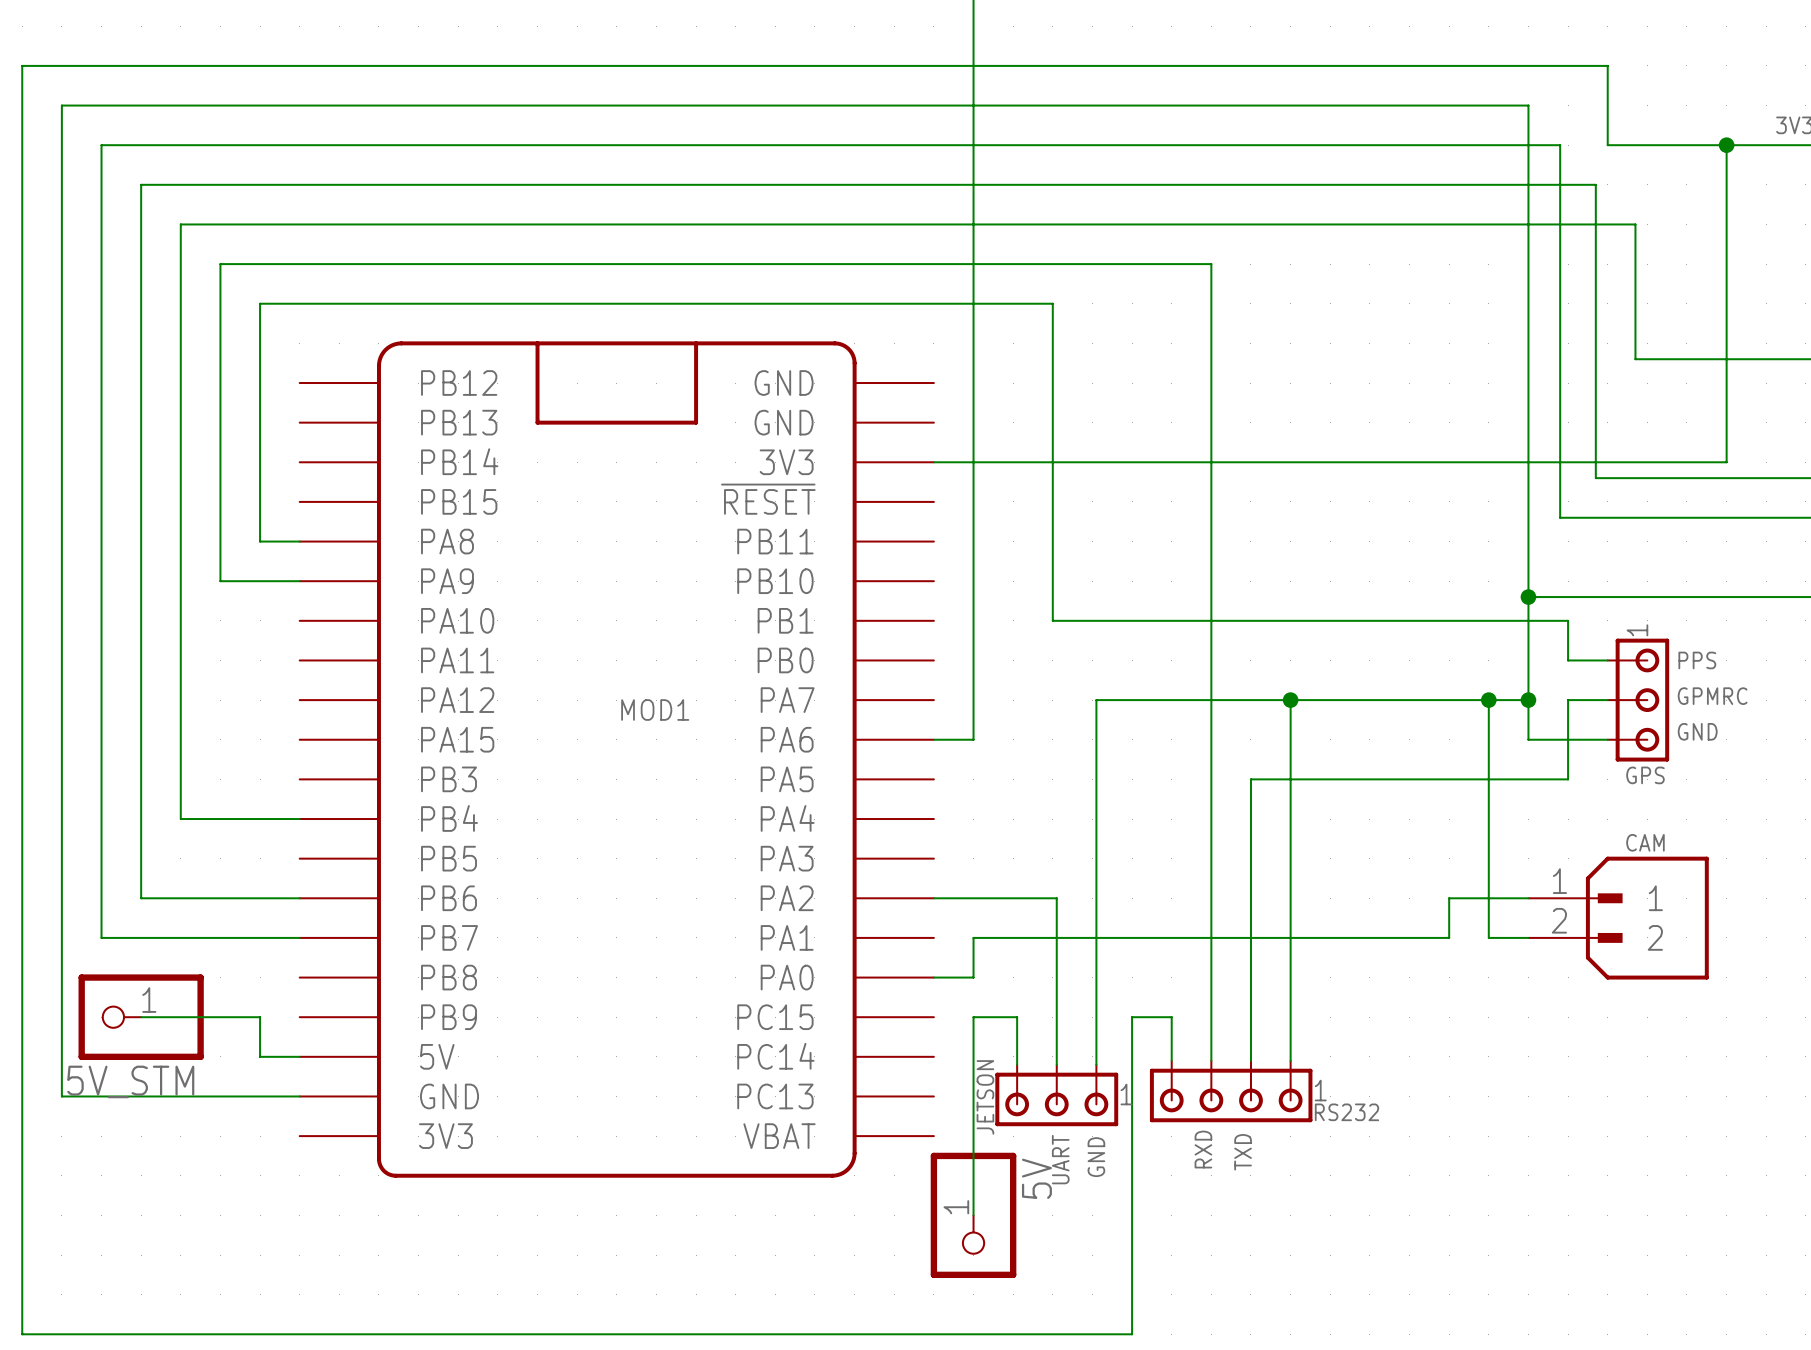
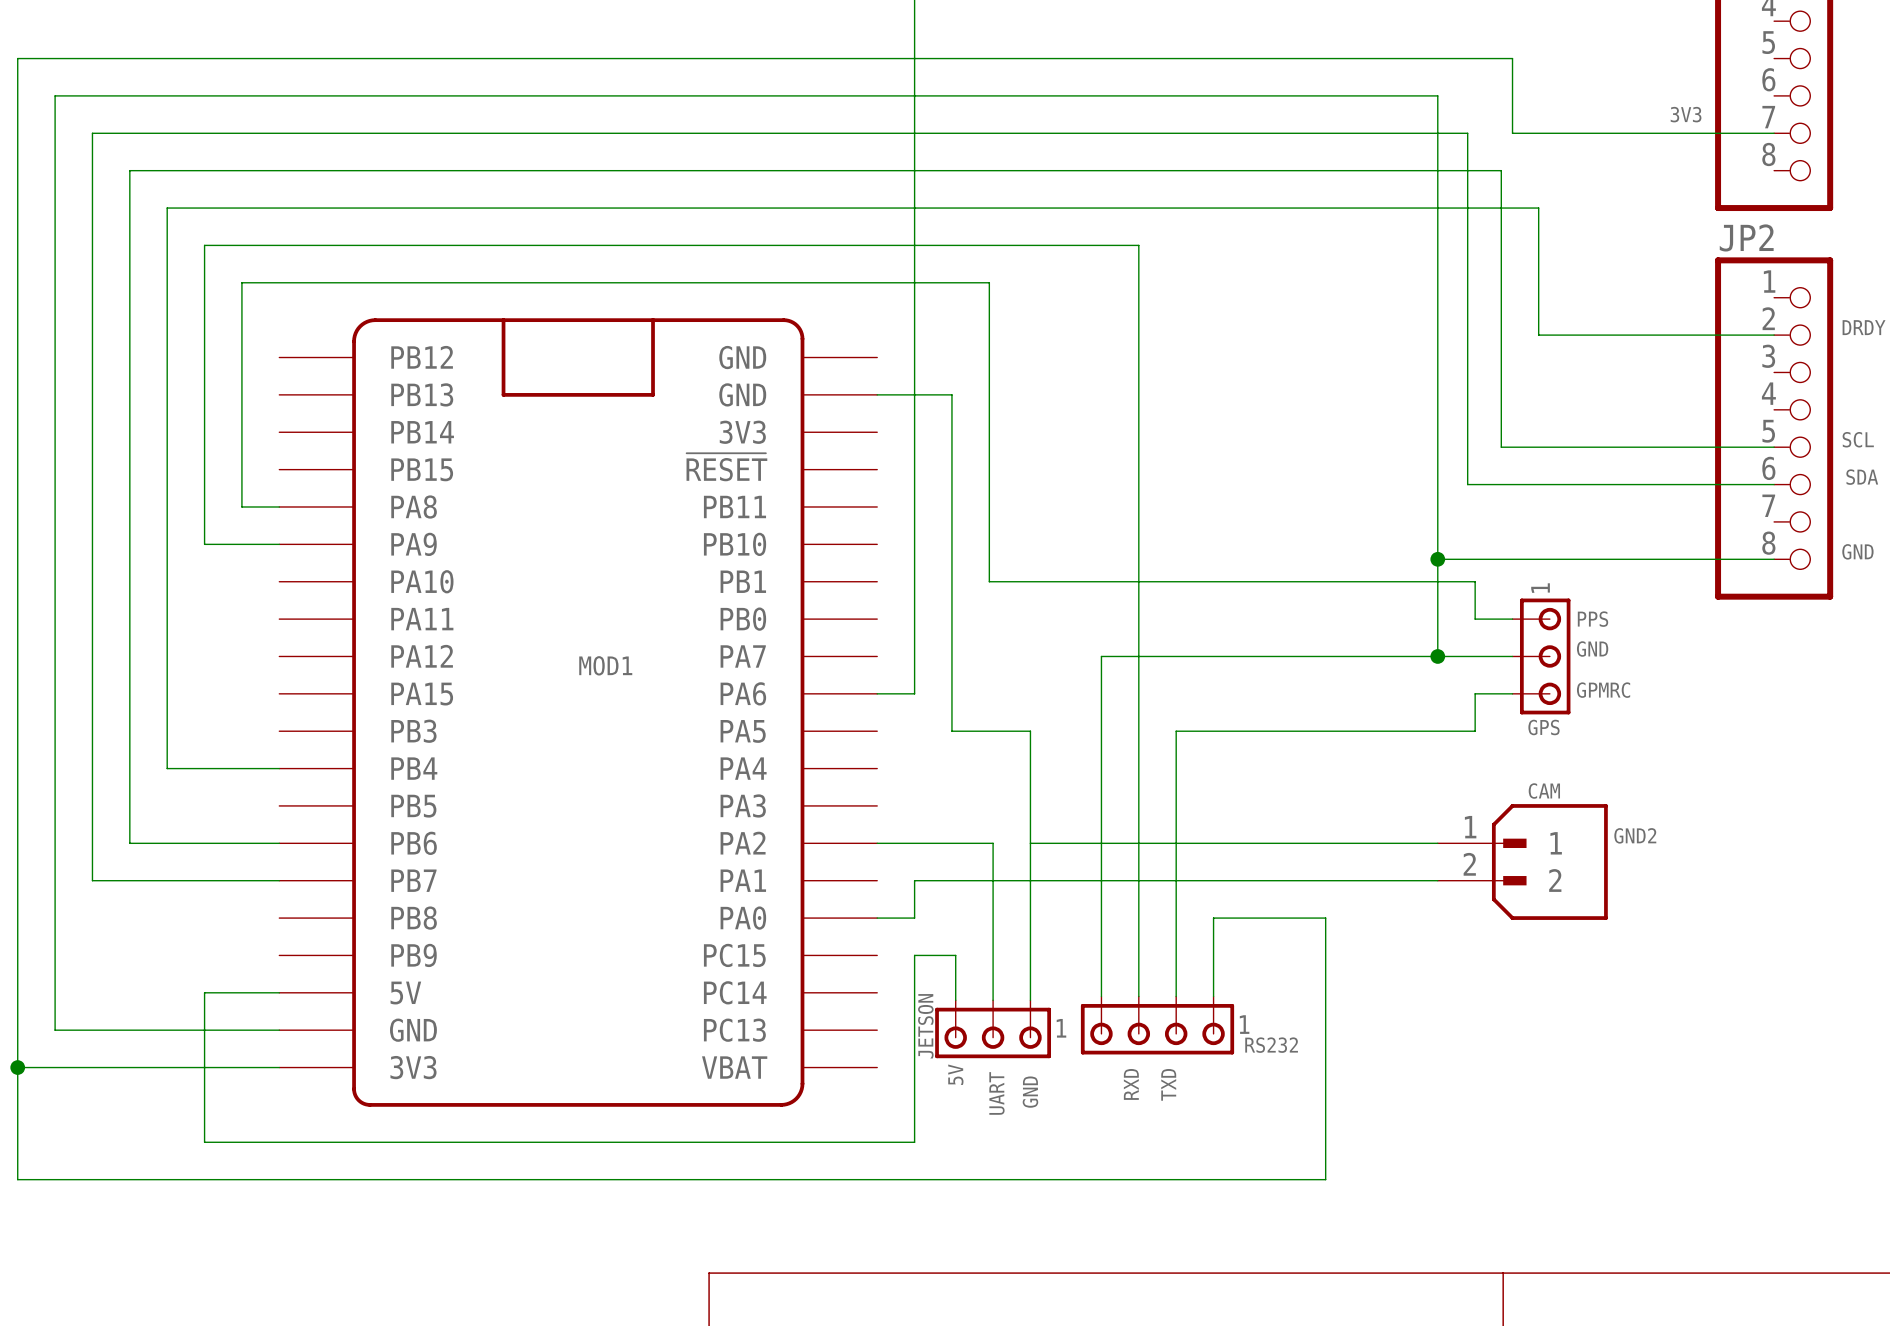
wire: (1726, 145) (1726, 462) (933, 462) -> none
junction: (1726, 145) -> none
wire: none -> (877, 394) (951, 394) (951, 731) (1030, 731)
text position: GPMRC (1712, 696) -> GPMRC (1603, 690)
wire: (1171, 700) (1096, 700) (1096, 779) -> (1101, 656) (1101, 955)
wire: (1290, 700) (1290, 977) -> none
junction: (1290, 700) -> none
wire: (1488, 700) (1488, 937) -> none
junction: (1488, 700) -> none
wire: (1528, 700) (1528, 739) (1568, 739) (1568, 700) -> (1437, 656) (1475, 656)
text position: GND (1697, 731) -> GND (1592, 649)
label: none -> GND2 (1635, 835)
wire: none -> (1030, 843) (1363, 843)
wire: (1449, 898) (1449, 937) -> (1400, 880) (1363, 880)
wire: (141, 1017) (260, 1017) (260, 1056) -> (914, 1142) (204, 1142) (204, 992) (241, 992)
5V_STM: (141, 1017) -> none
wire: (1171, 1017) (1132, 1017) (1132, 1334) (22, 1334) (22, 1255) -> (1213, 918) (1325, 918) (1325, 1179) (17, 1179)
wire: none -> (17, 1067) (279, 1067)
junction: none -> (17, 1067)
label: none -> 5V (955, 1074)
5V: (973, 1215) -> none

